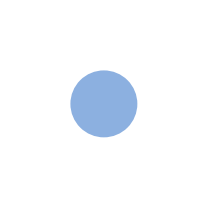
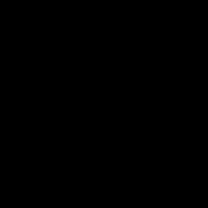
part: (103, 103) -> none

